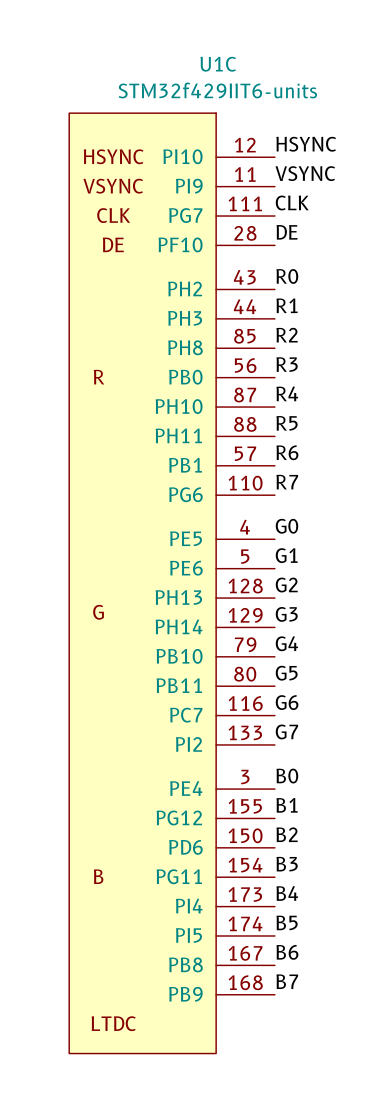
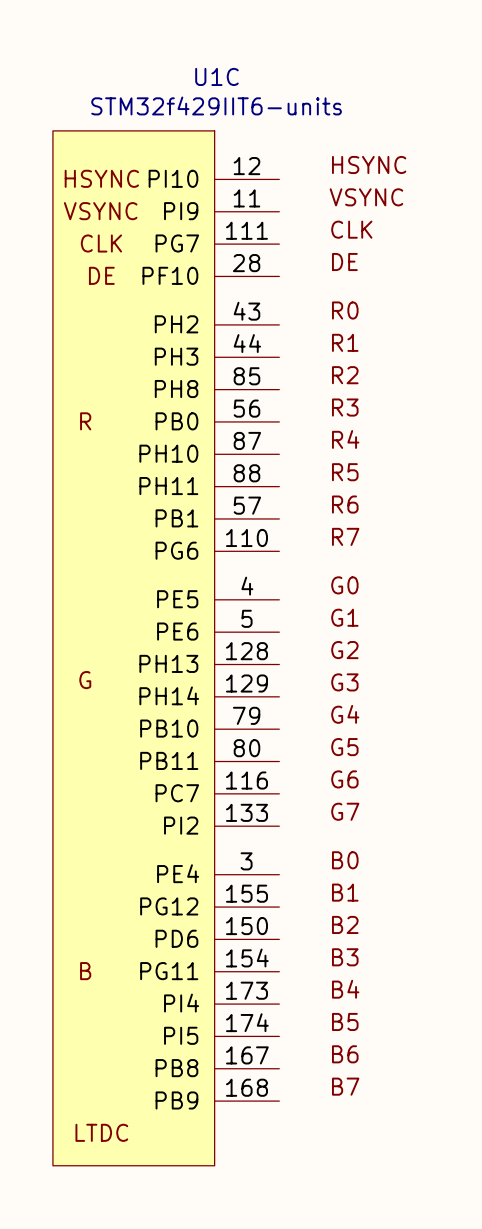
U1C position: (172, 583) -> (166, 648)

